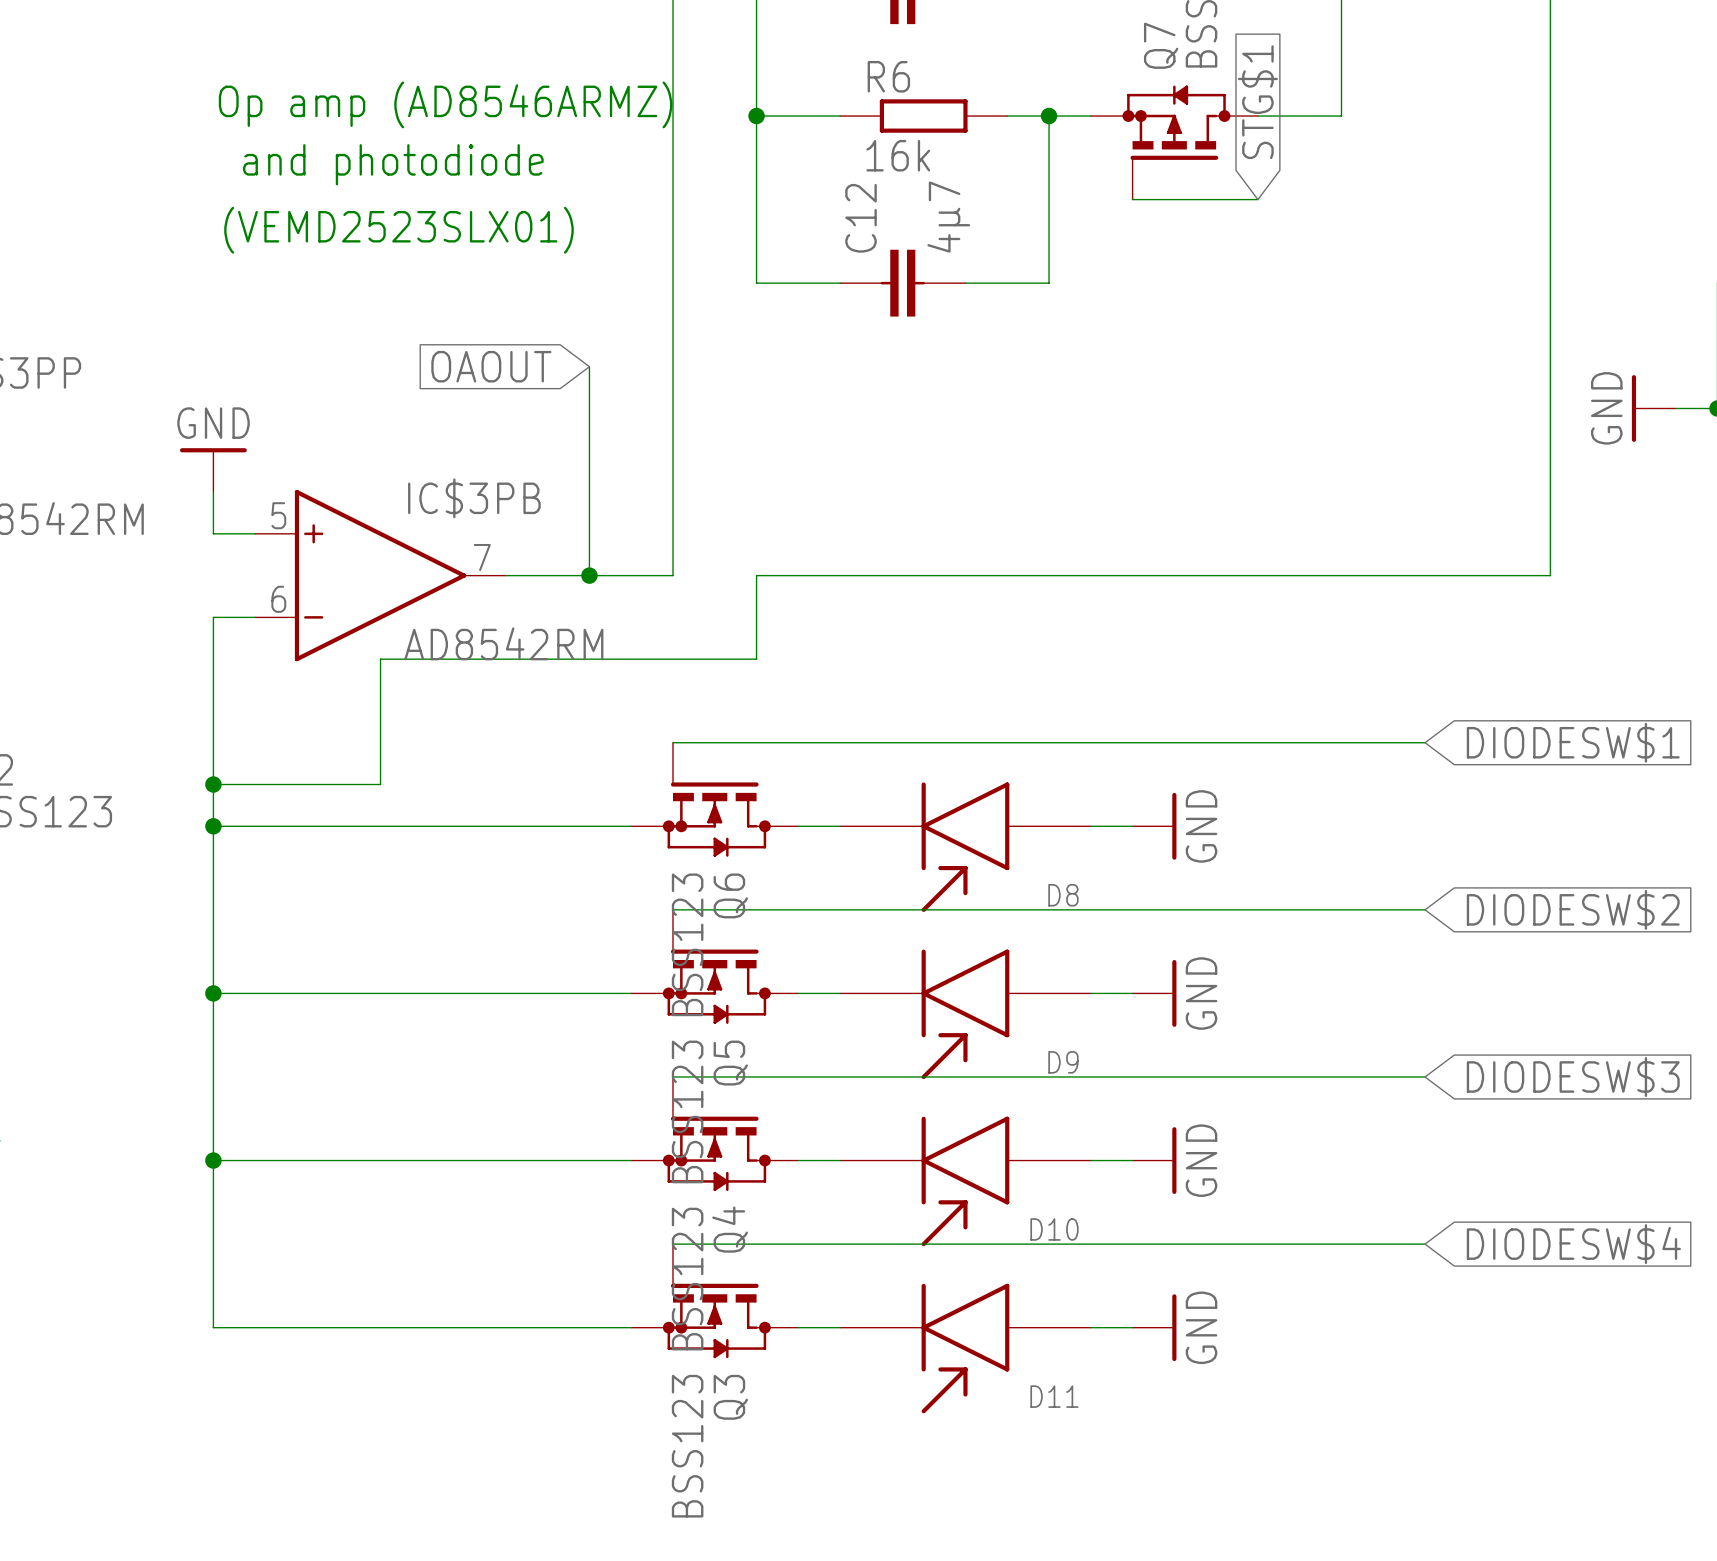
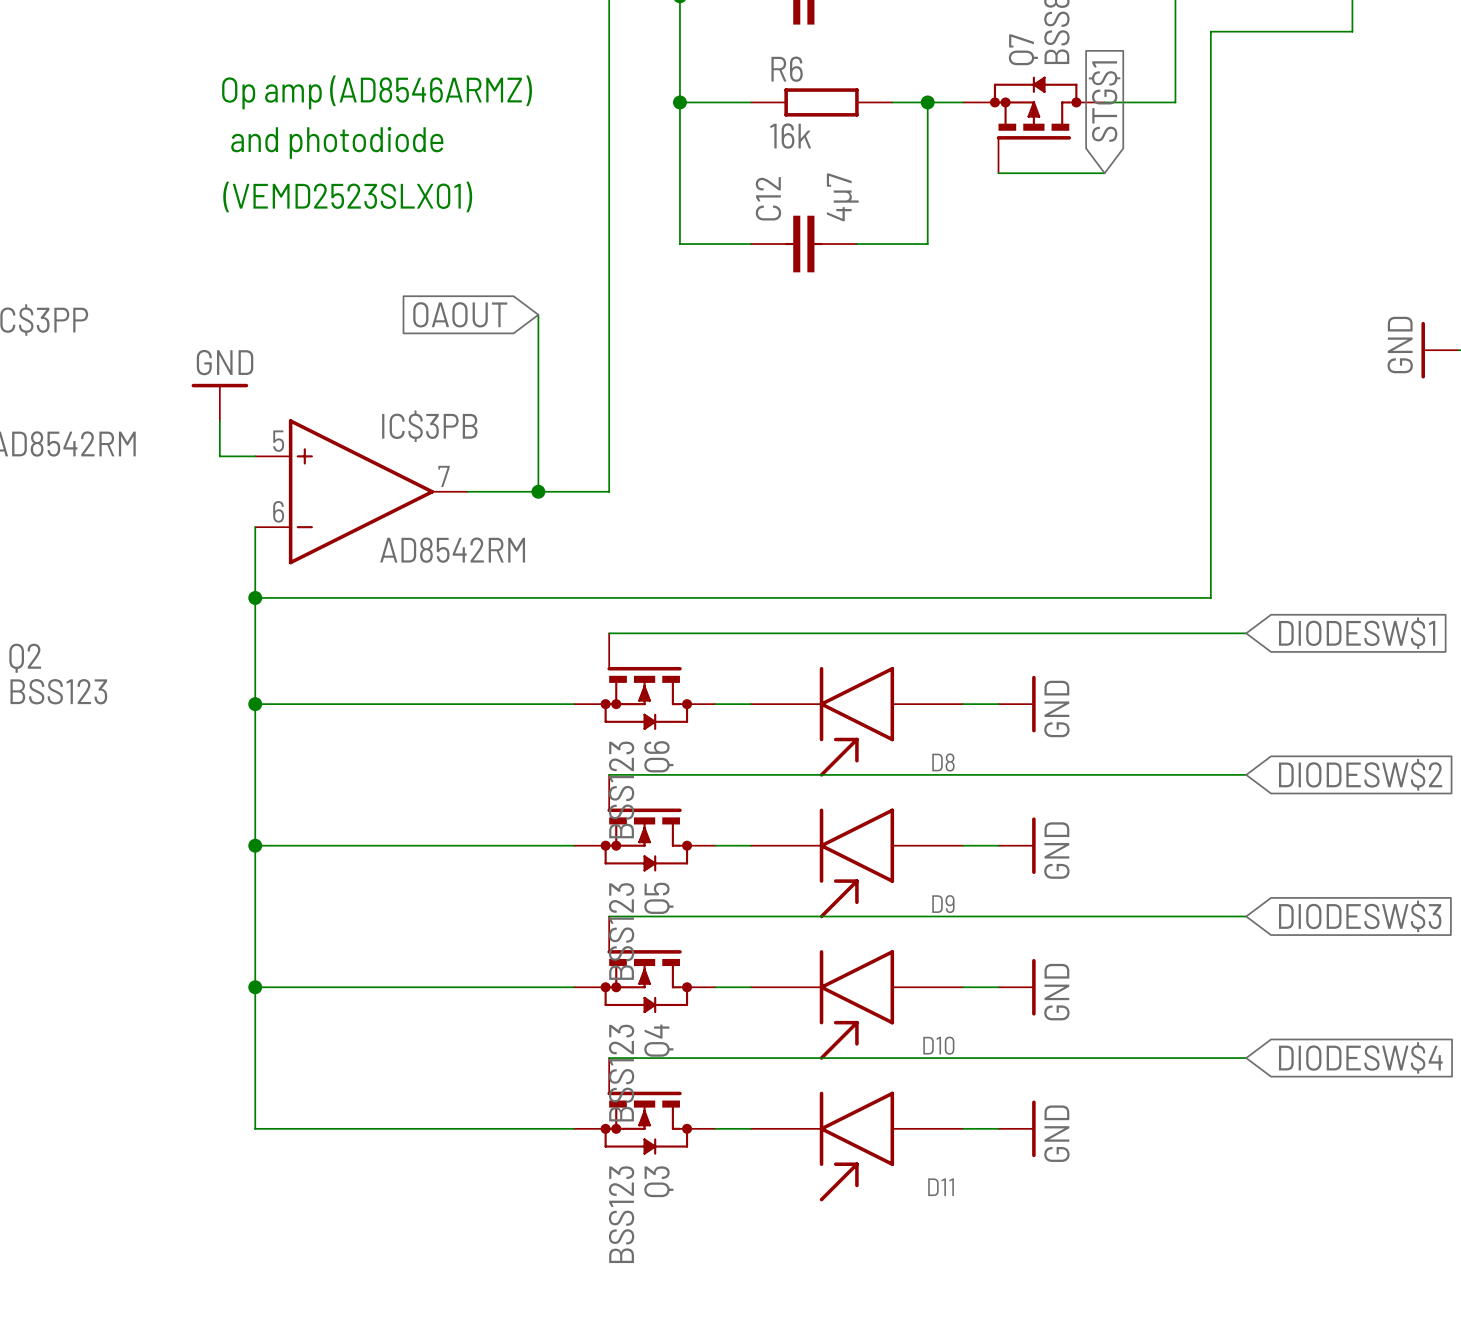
wire: (1550, 32) (1550, 575) (756, 575) (756, 659) (380, 659) (380, 784) (213, 784) -> (1352, 31) (1210, 31) (1210, 597) (255, 597)
wire: (255, 617) (213, 617) (213, 1327) (255, 1327) -> (255, 527) (255, 1128)
junction: none -> (255, 597)
junction: (213, 784) -> none
wire: (213, 826) (255, 826) -> none
junction: (213, 826) -> none
junction: none -> (255, 704)
wire: (213, 993) (255, 993) -> none
junction position: (213, 993) -> (255, 845)
wire: (213, 1160) (255, 1160) -> none
junction position: (213, 1160) -> (255, 987)

